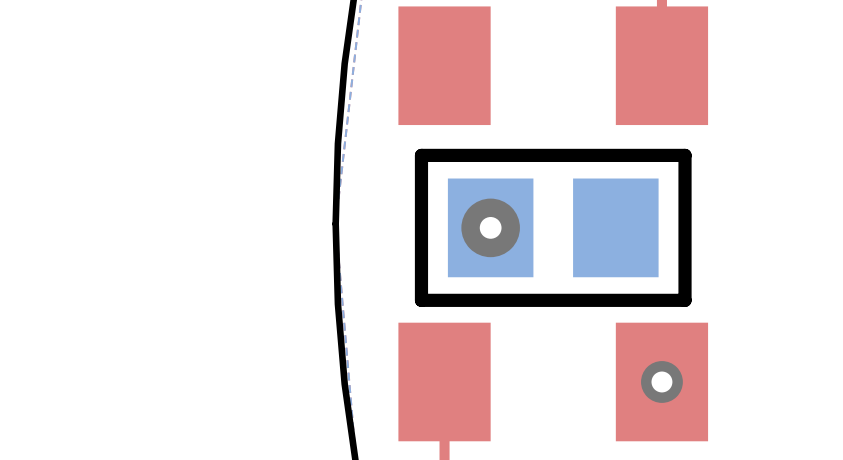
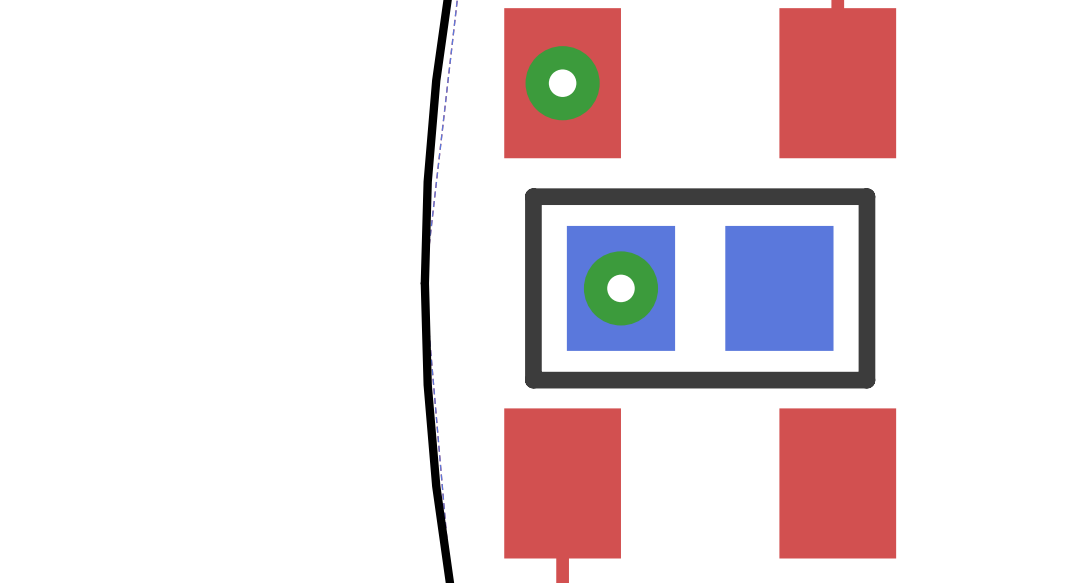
via: none -> (562, 83)
via: (661, 381) -> none

